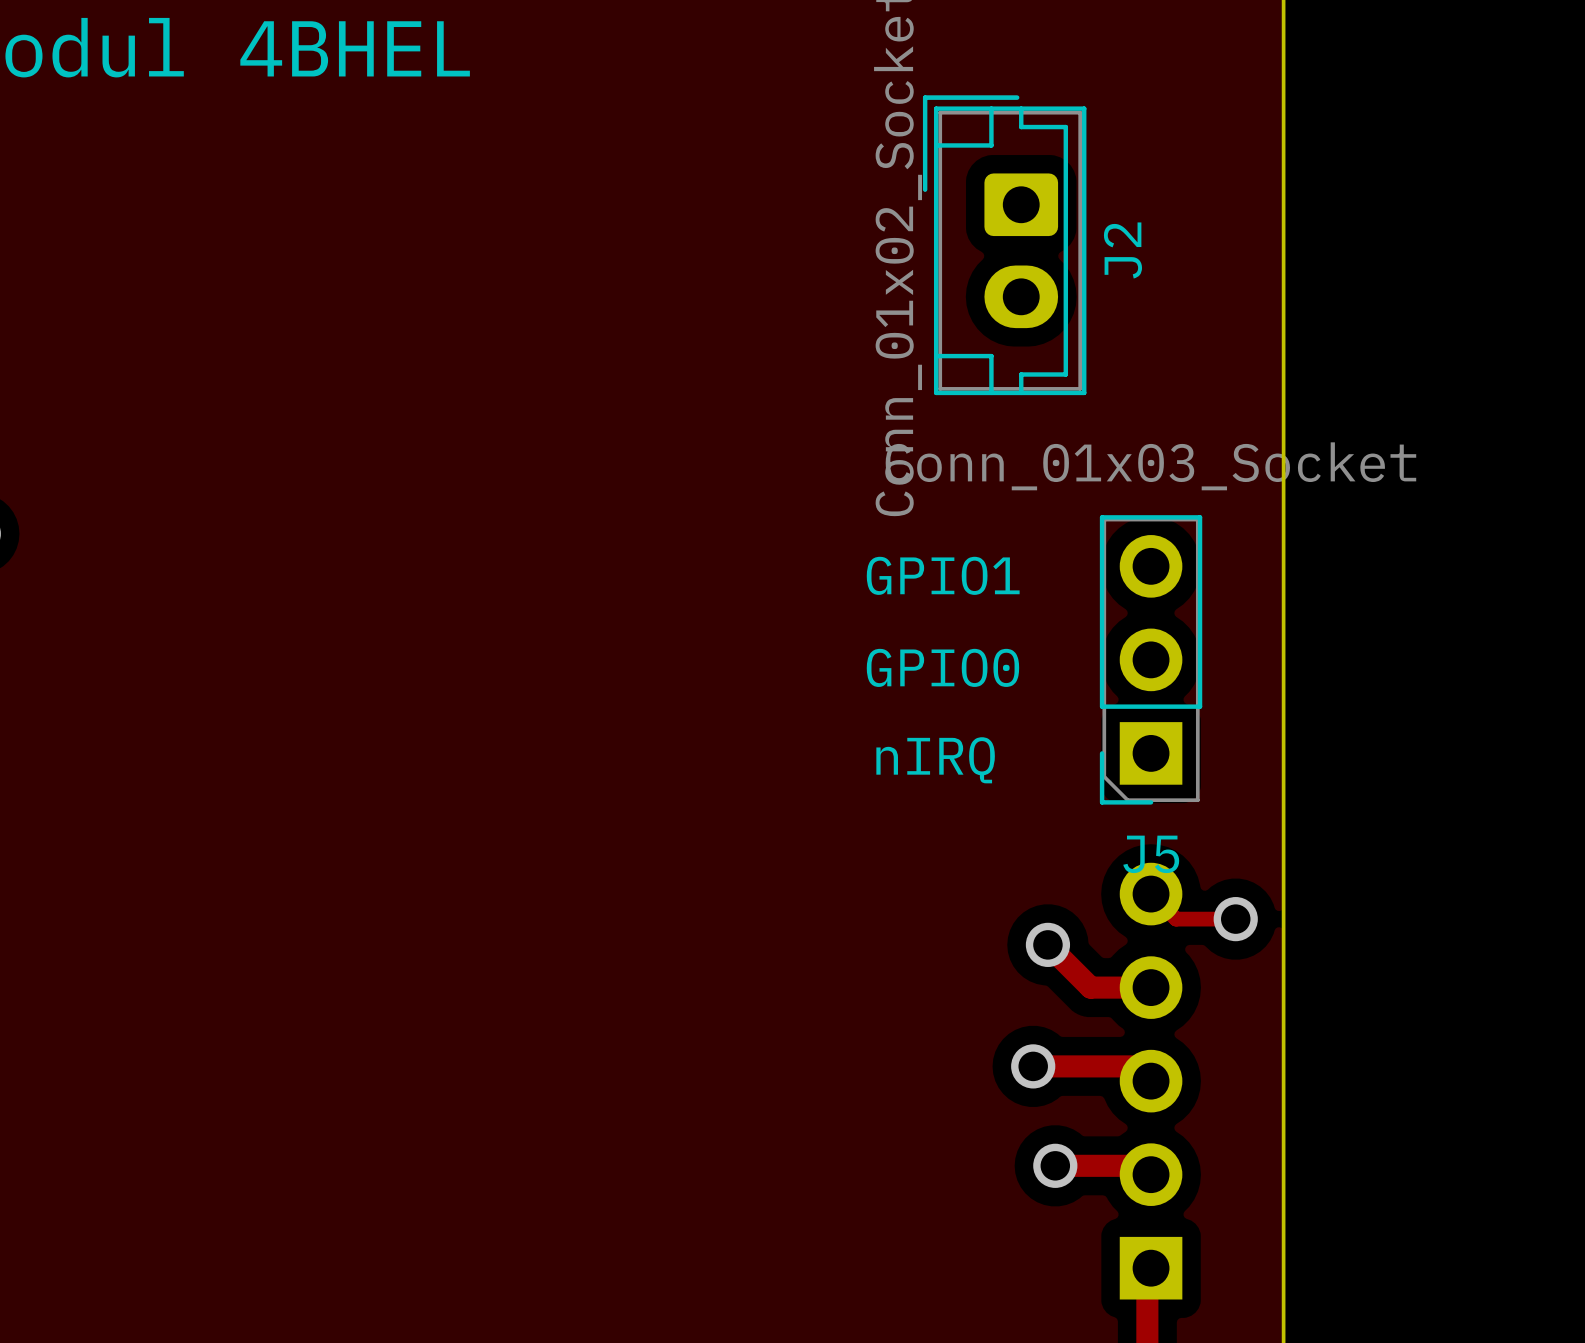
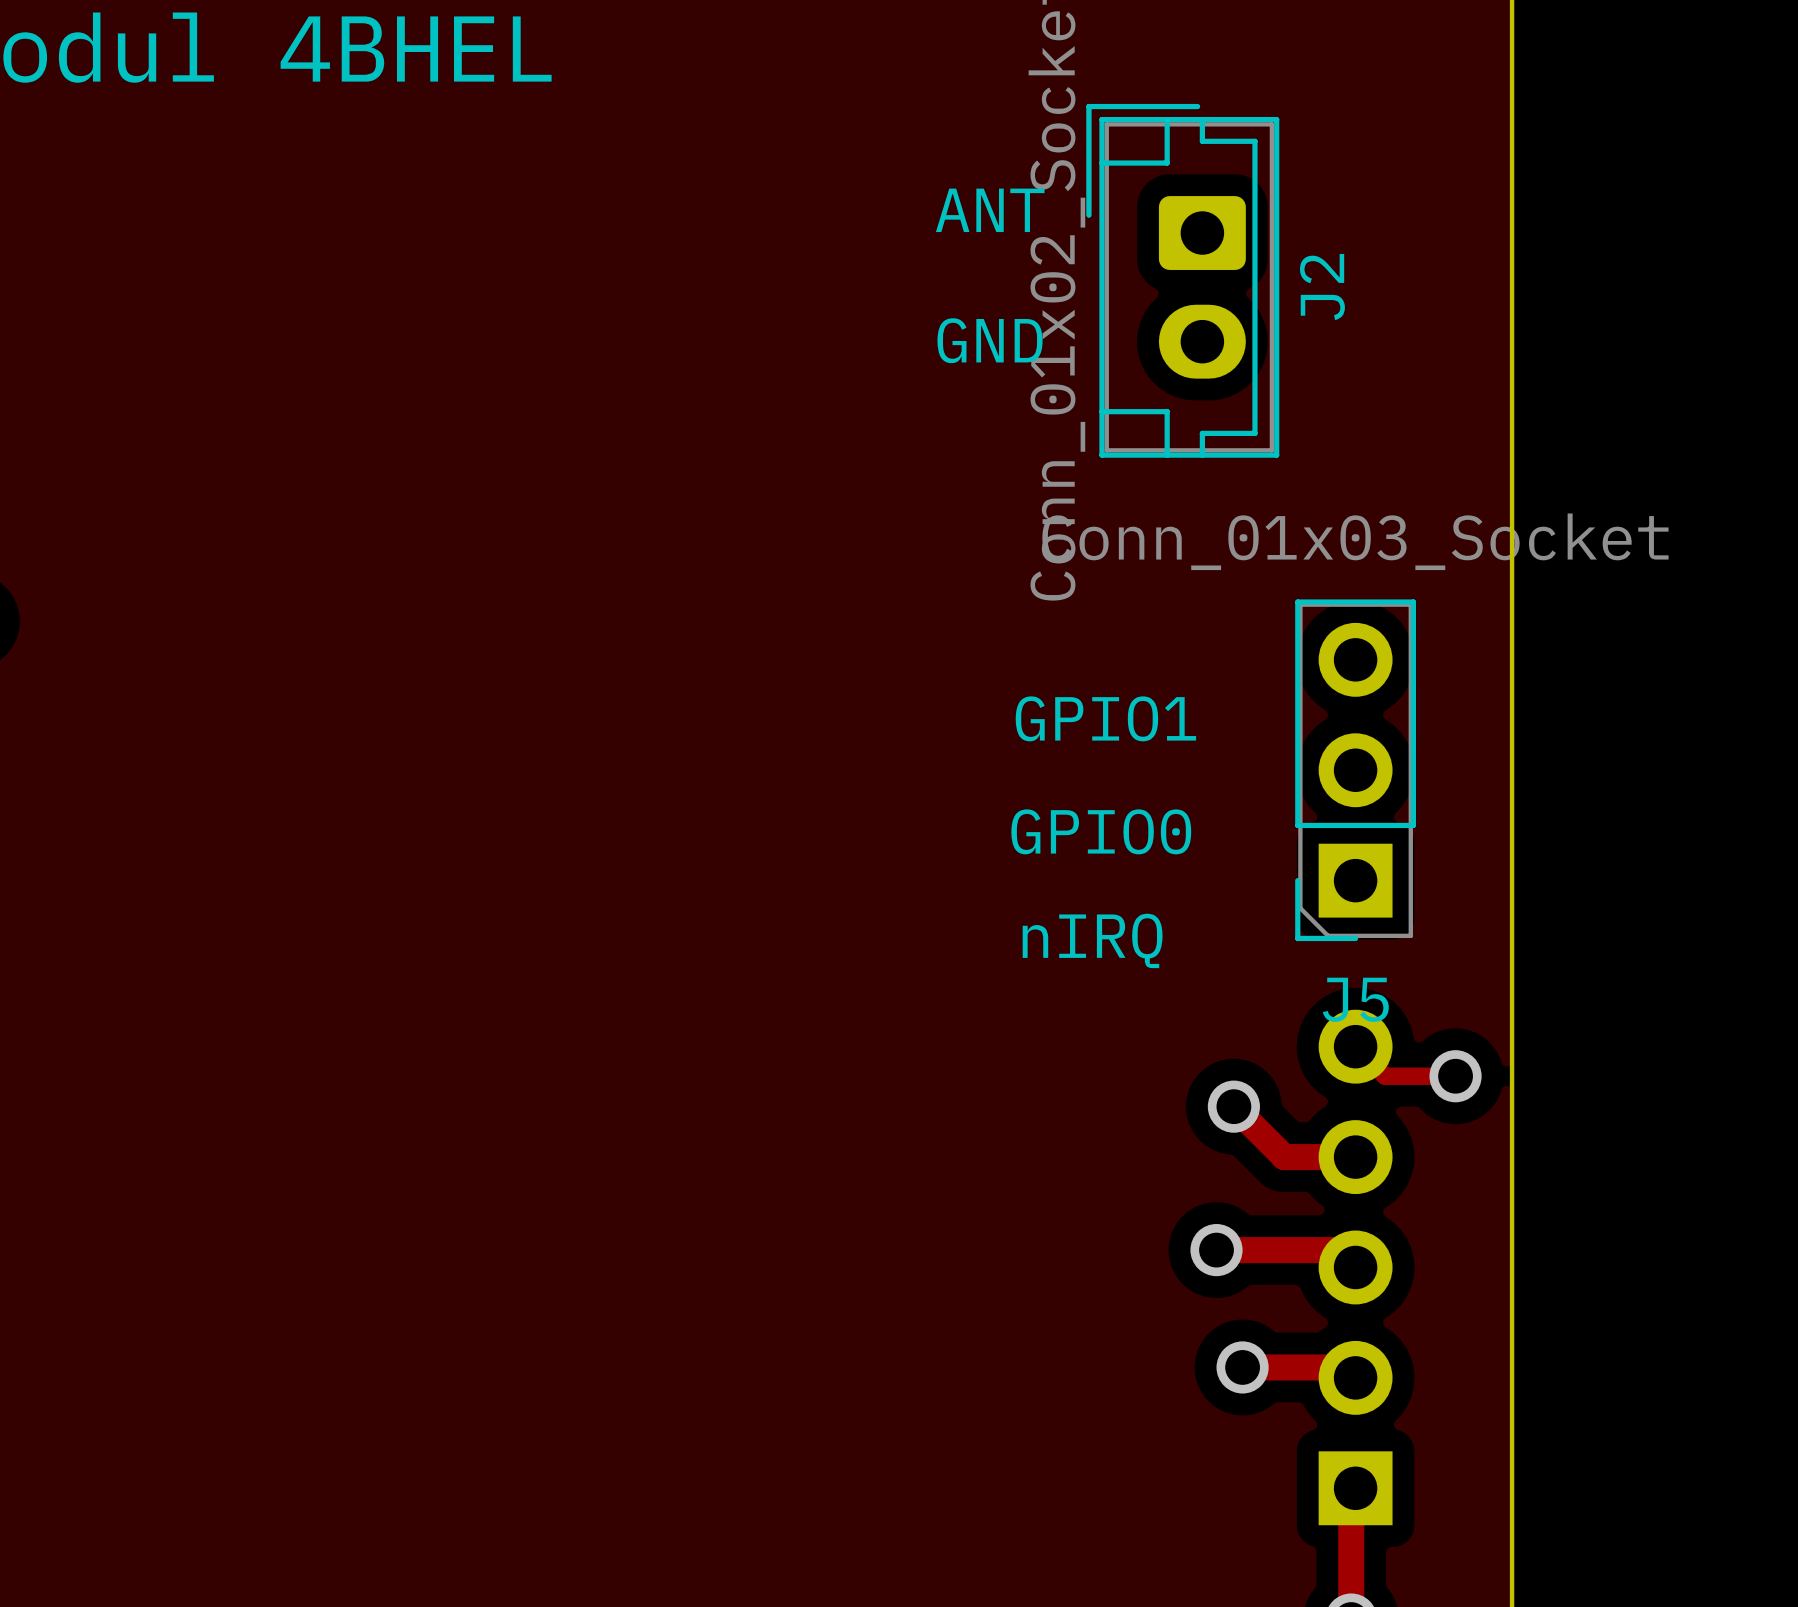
text: none -> ANT (990, 210)
text: none -> GND (990, 340)
text position: GPIO1 (943, 575) -> GPIO1 (1105, 718)
text position: GPIO0 (942, 667) -> GPIO0 (1101, 831)
text position: nIRQ (935, 760) -> nIRQ (1092, 940)

